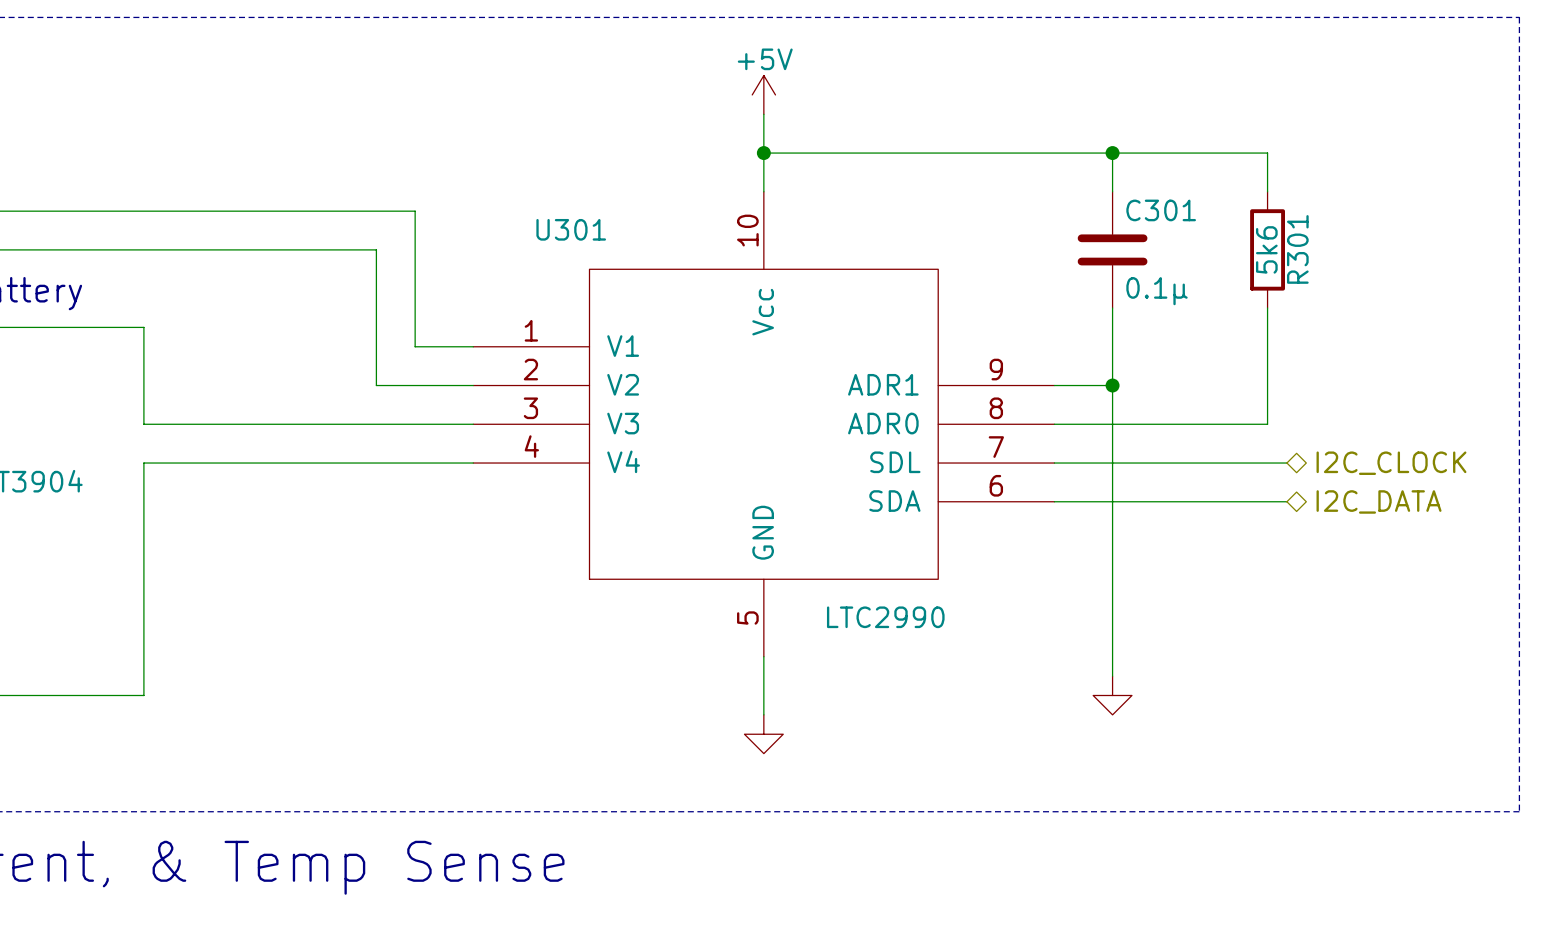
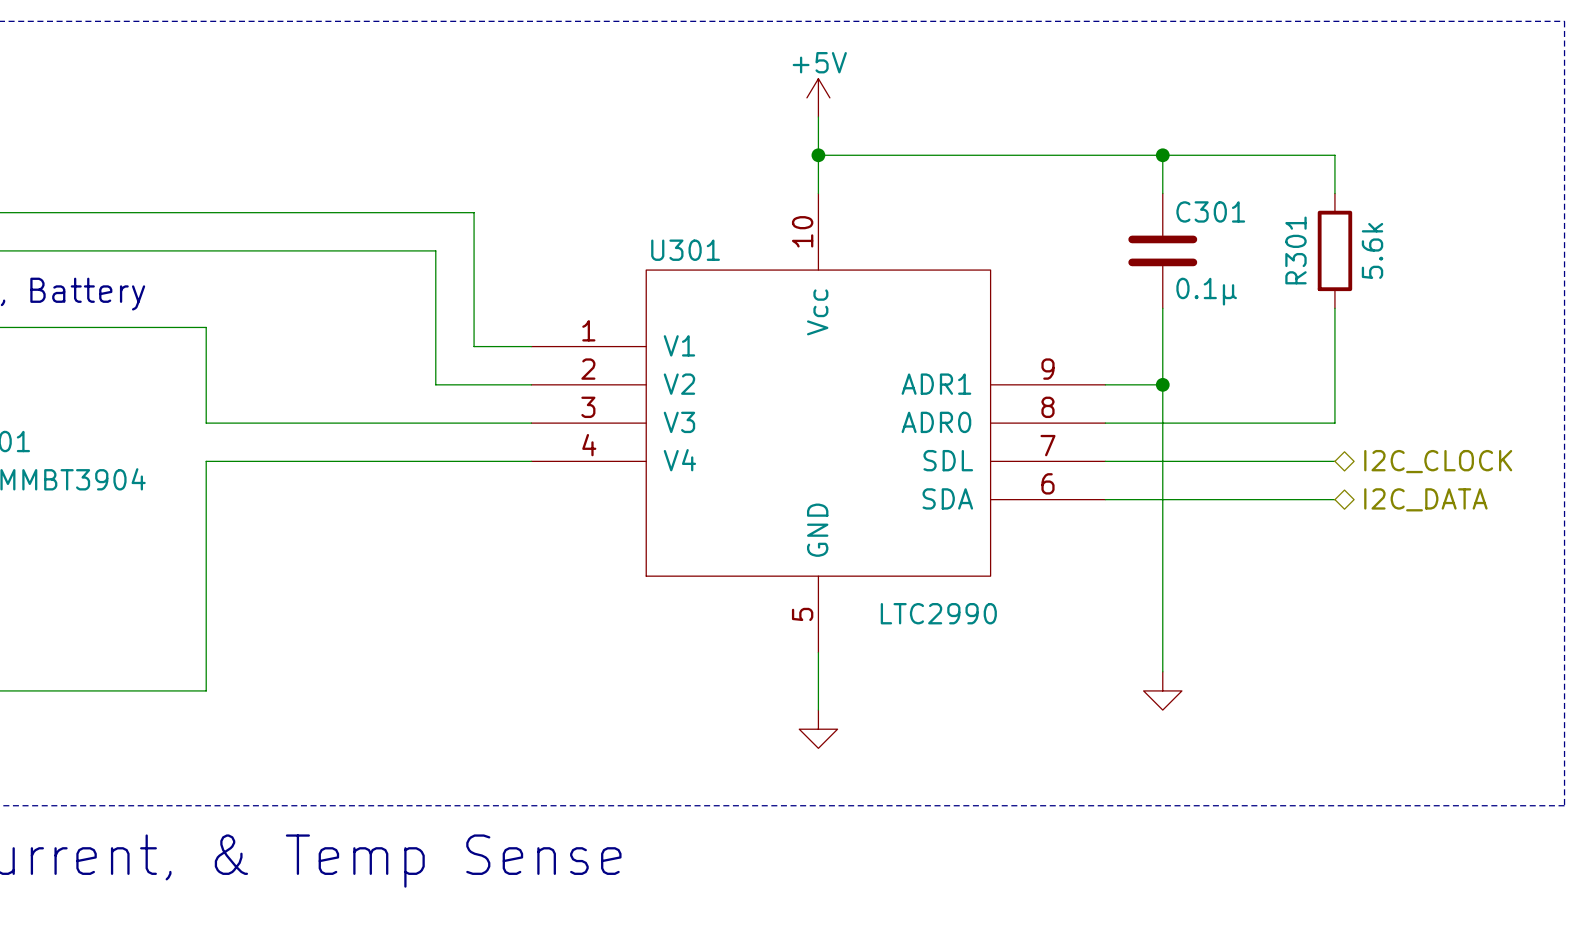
wire: (1267, 153) (1267, 191) -> (1315, 155) (1334, 155) (1334, 193)
U301 name position: U301 (571, 229) -> U301 (685, 250)
R301 value: 5k6 (1266, 249) -> 5.6k (1372, 250)
R301 position: (1267, 249) -> (1334, 250)
R301 name position: R301 (1297, 249) -> R301 (1295, 250)
wire: (1267, 308) (1267, 424) -> (1334, 308) (1334, 423) (1315, 423)

